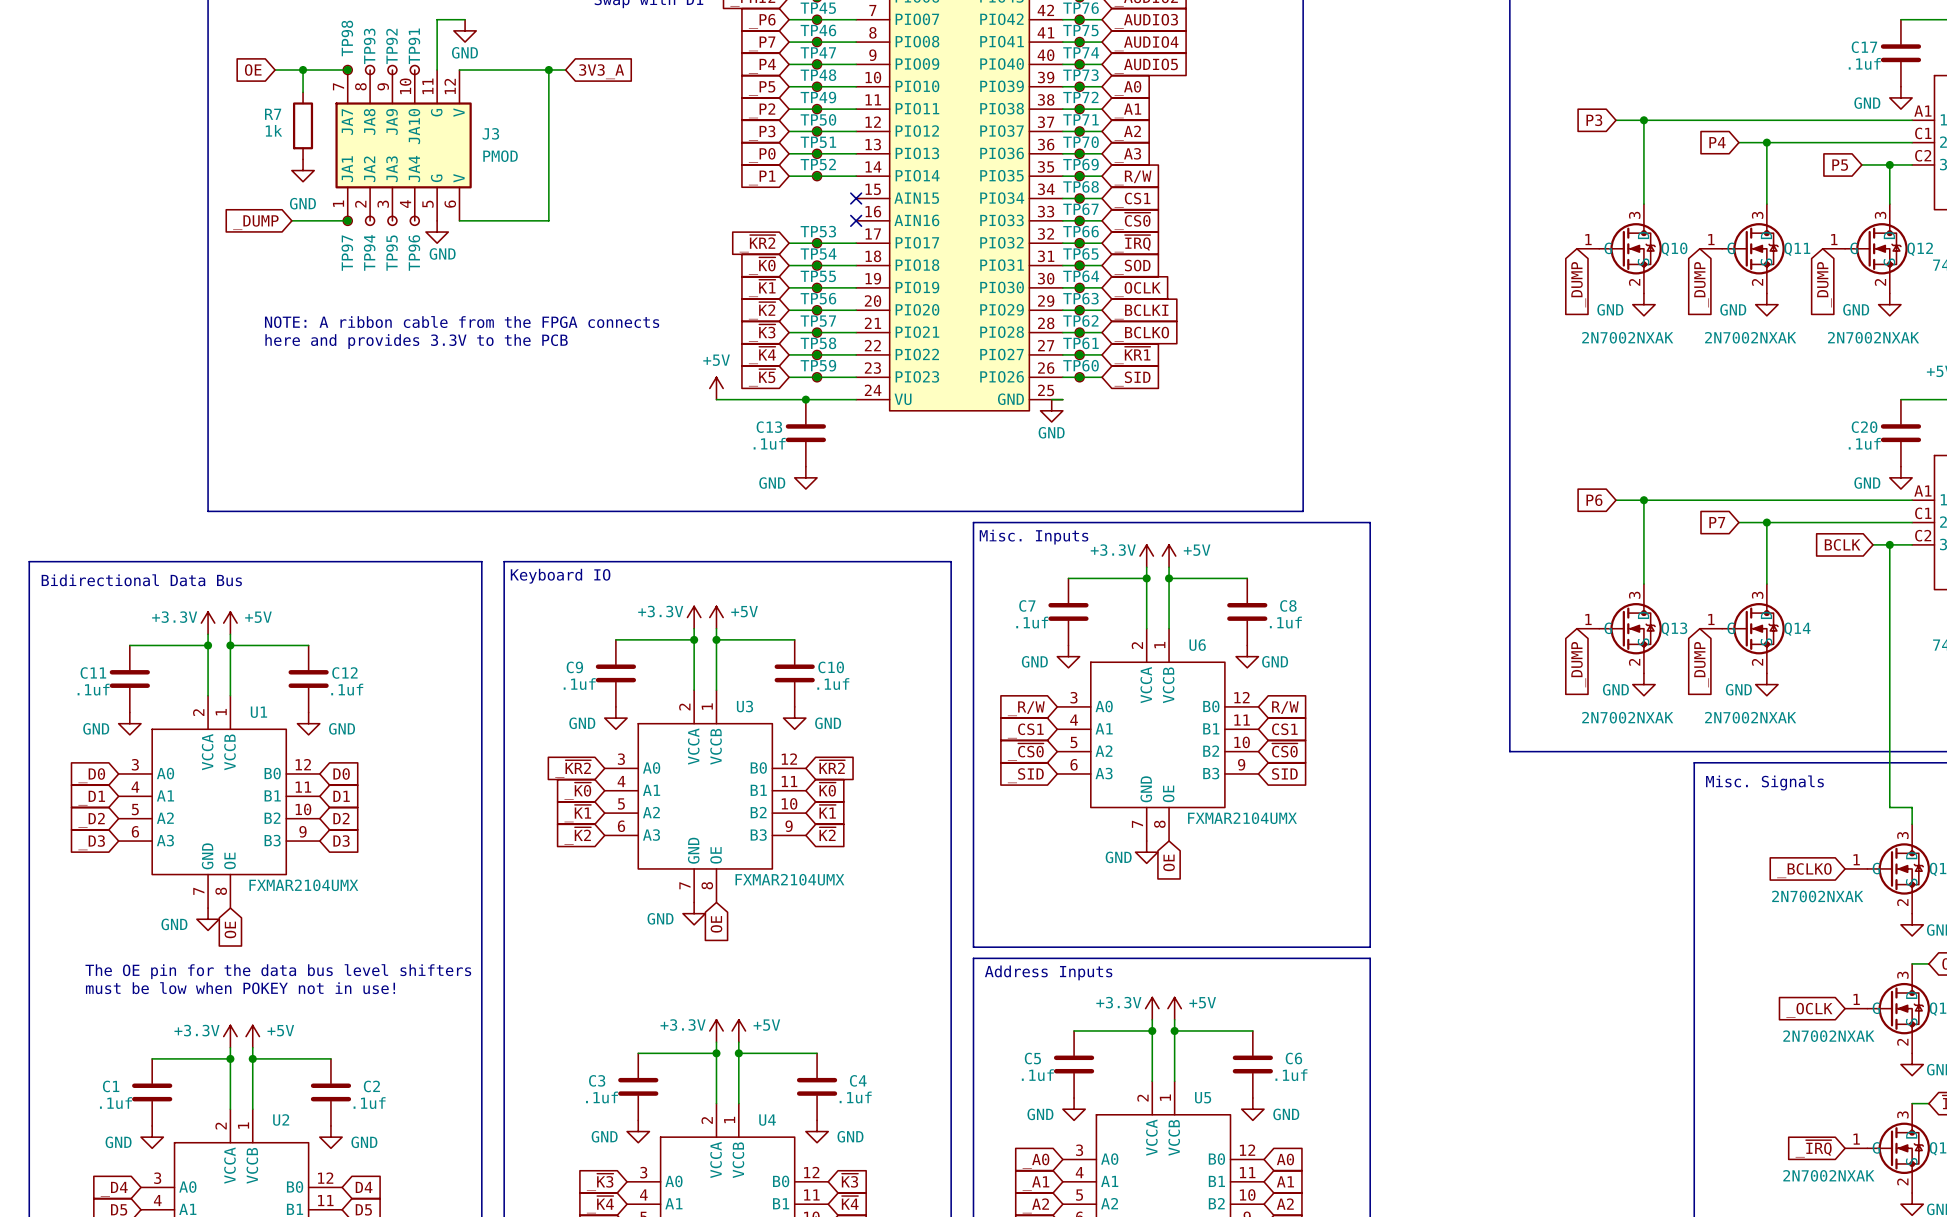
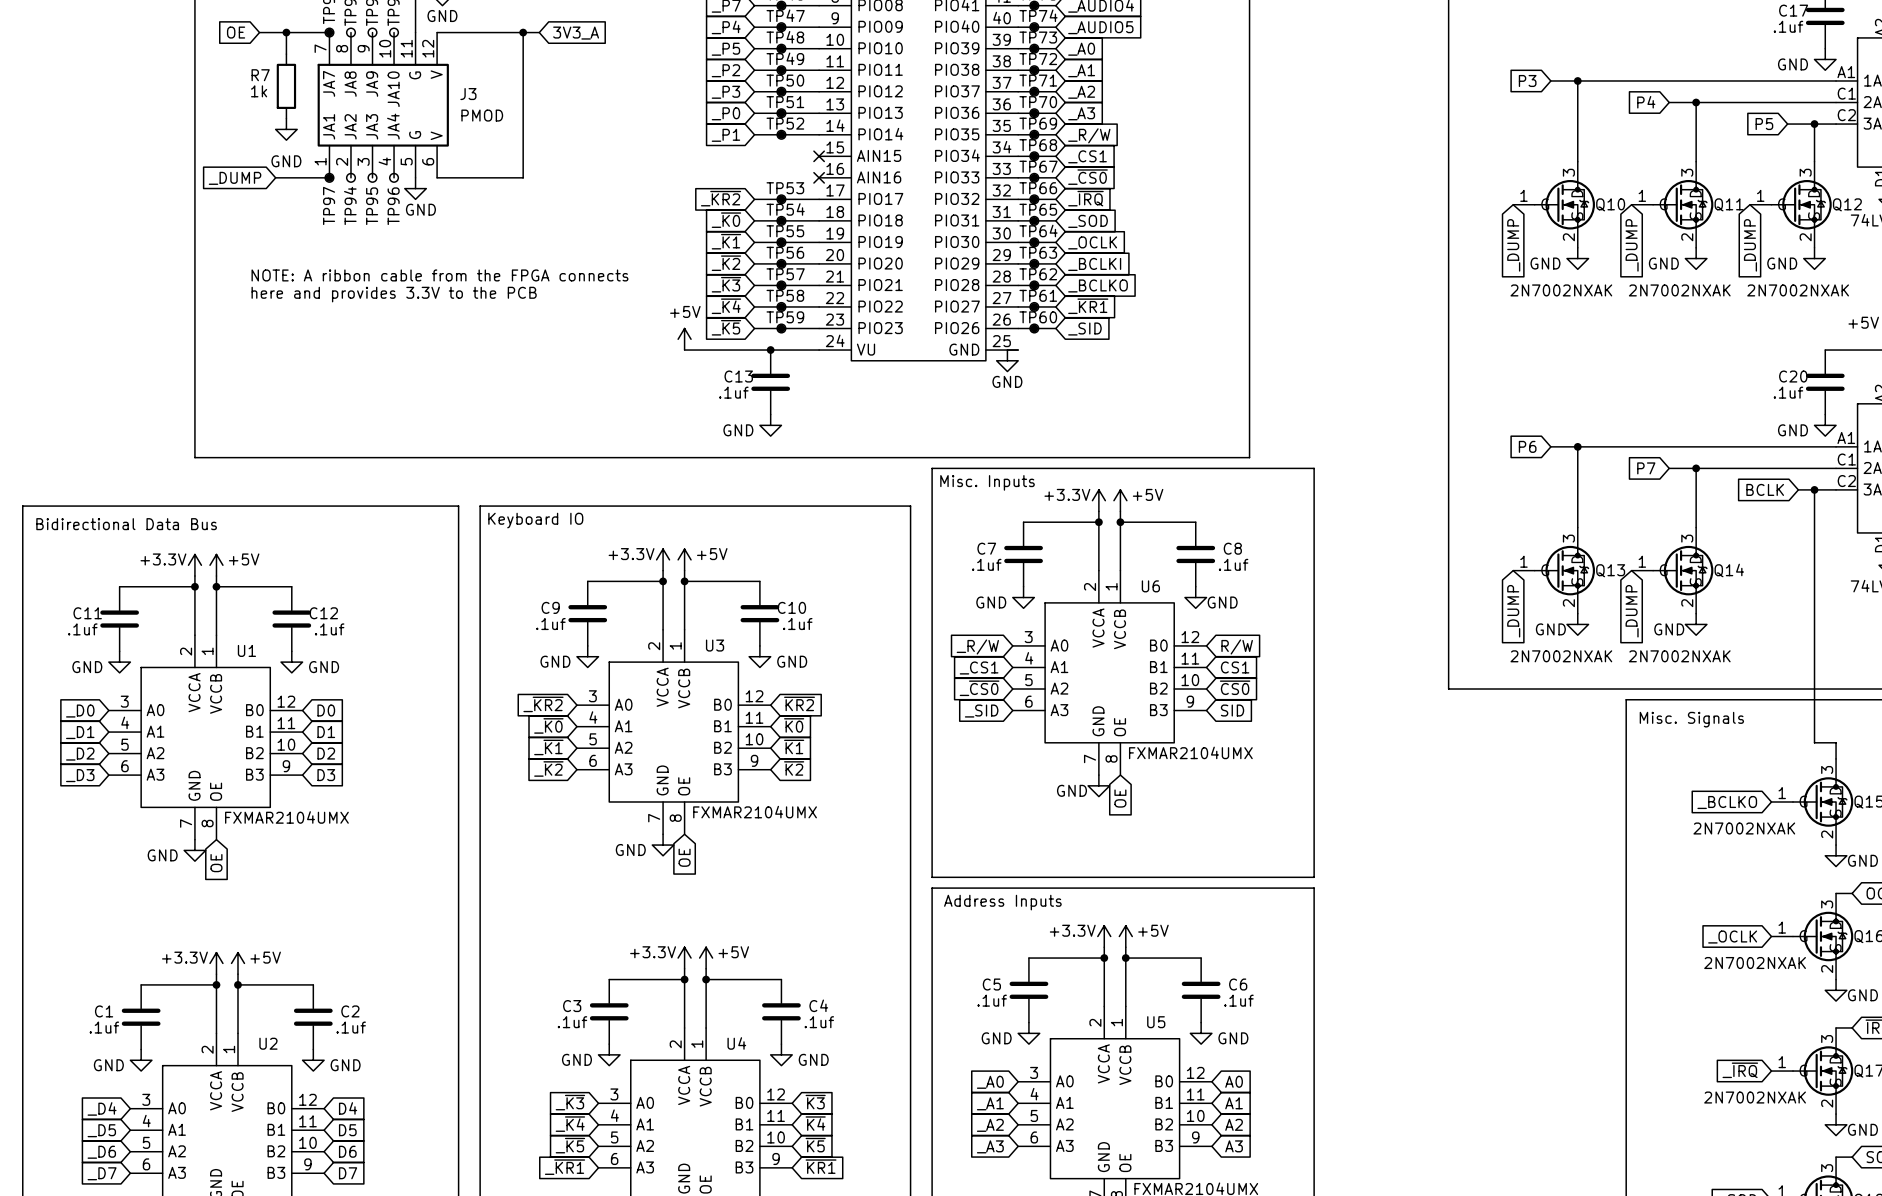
text: The OE pin for the data bus level shifters (278, 971) -> none
text: must be low when POKEY not in use! (240, 988) -> none

